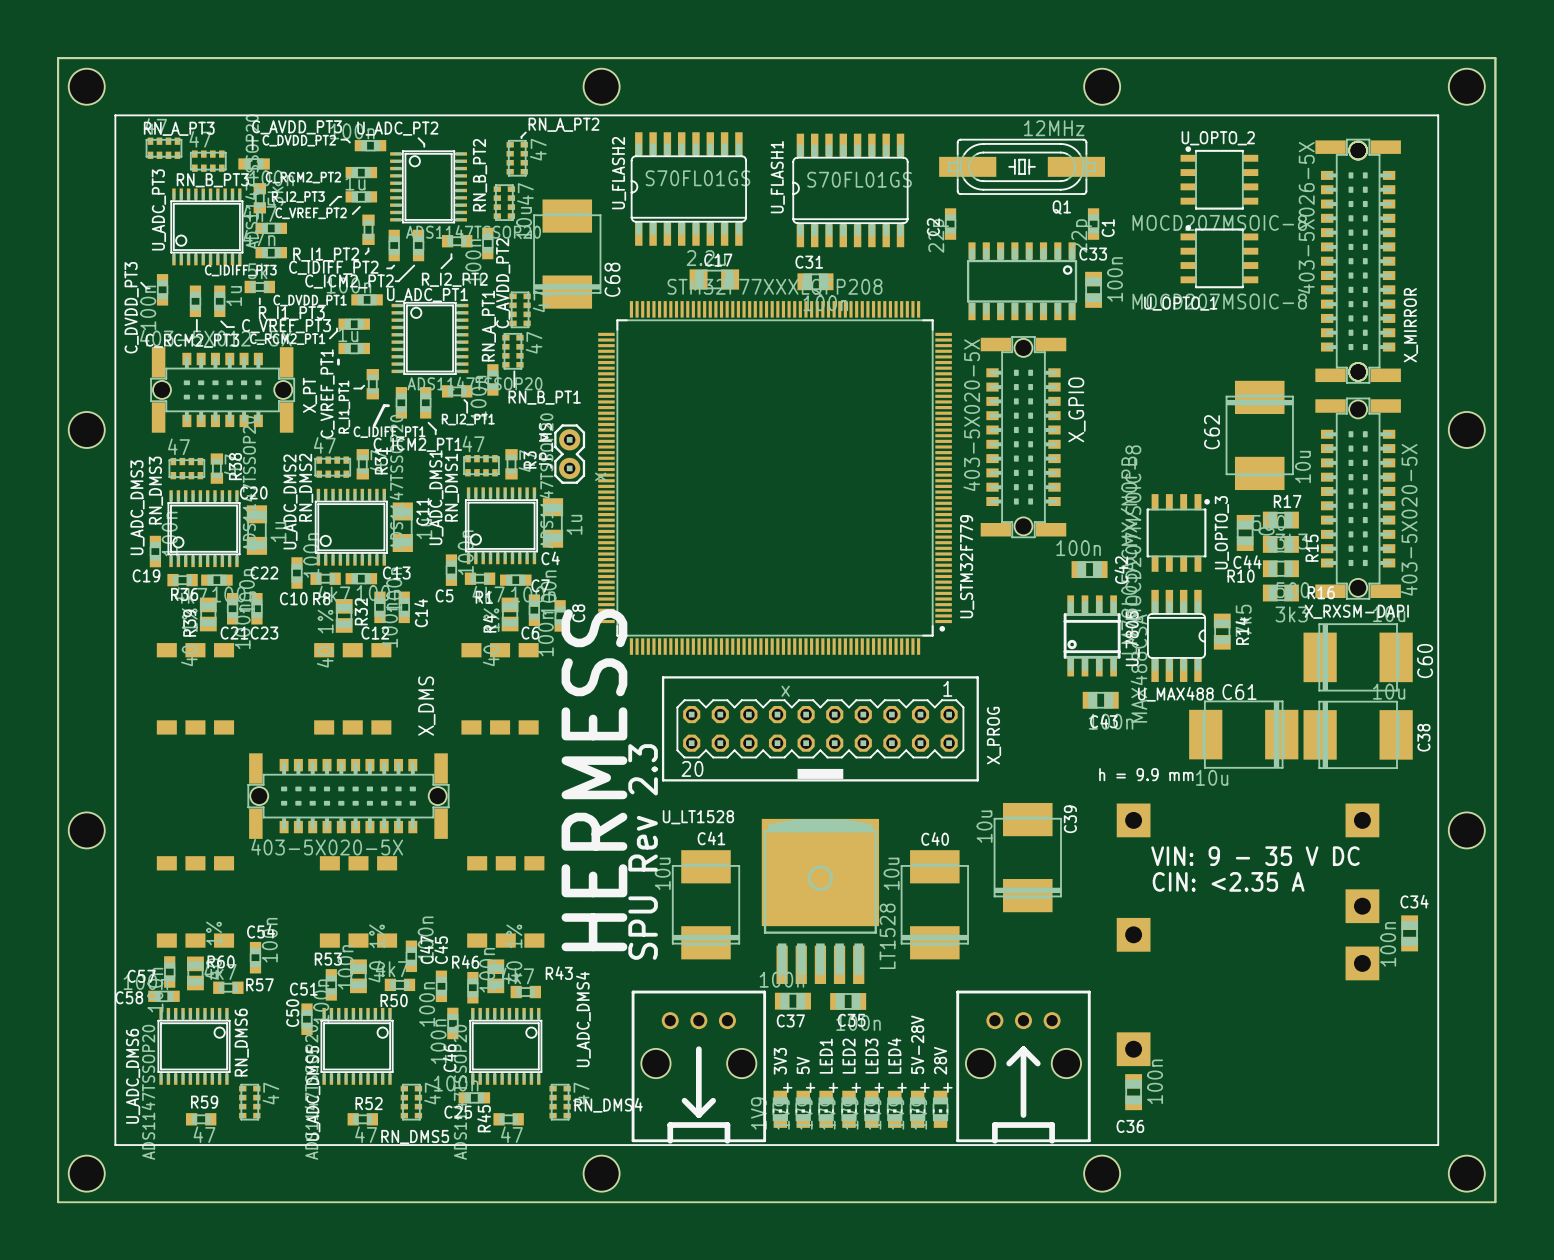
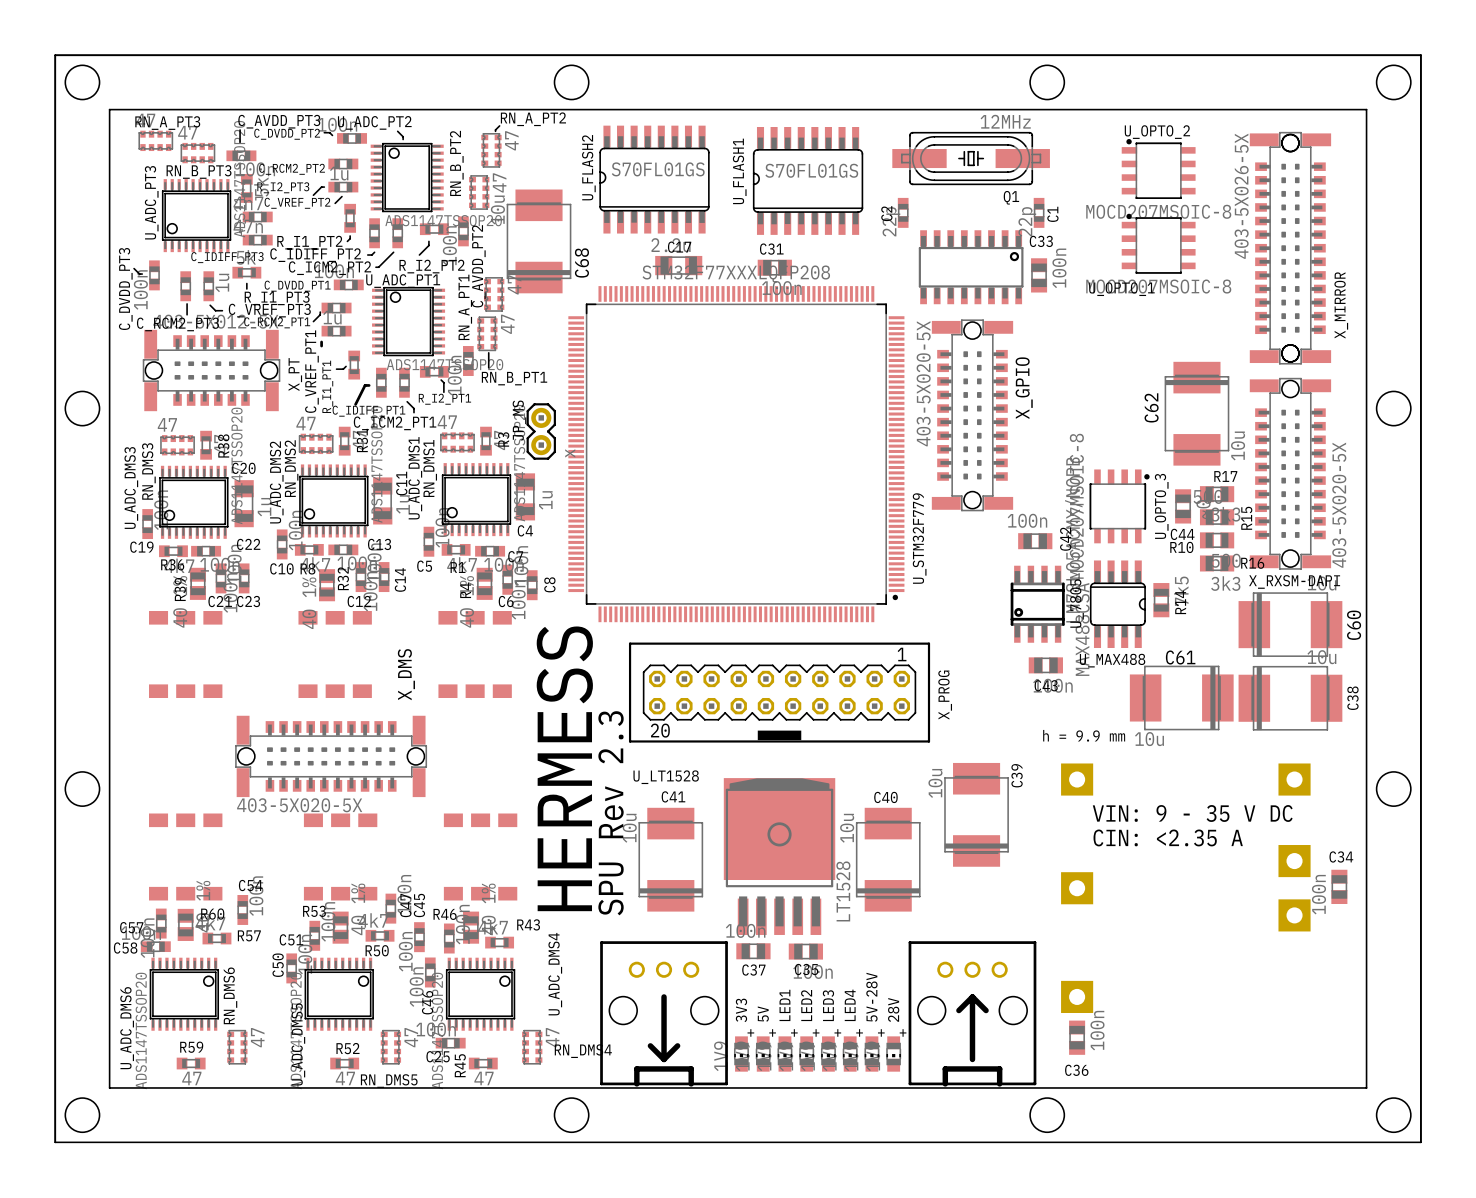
X_PROG value: x (785, 691) -> none

